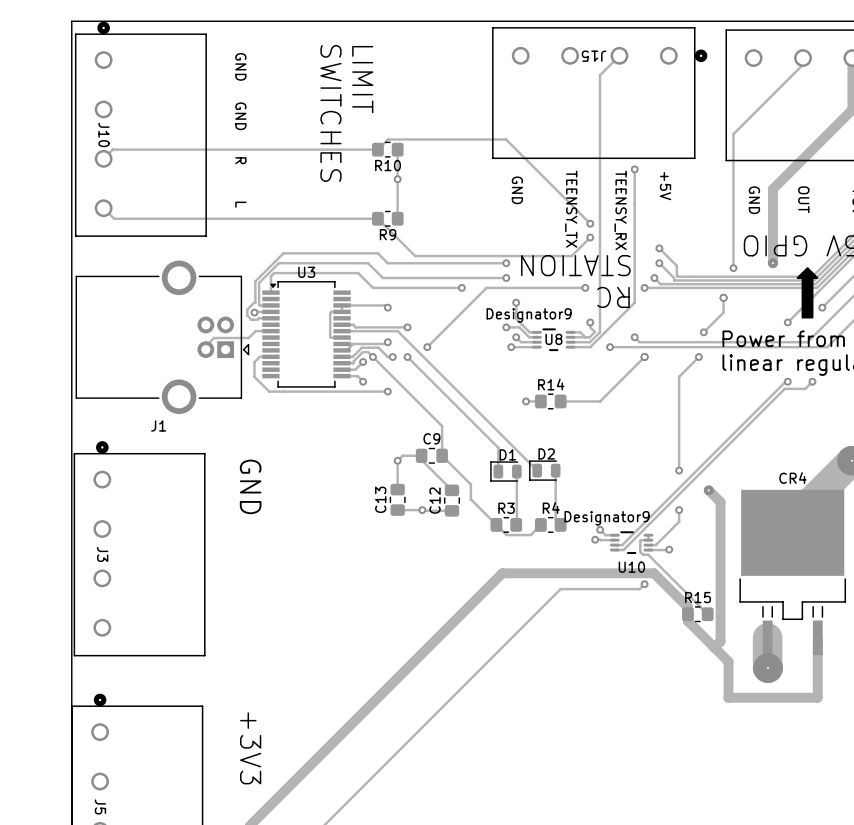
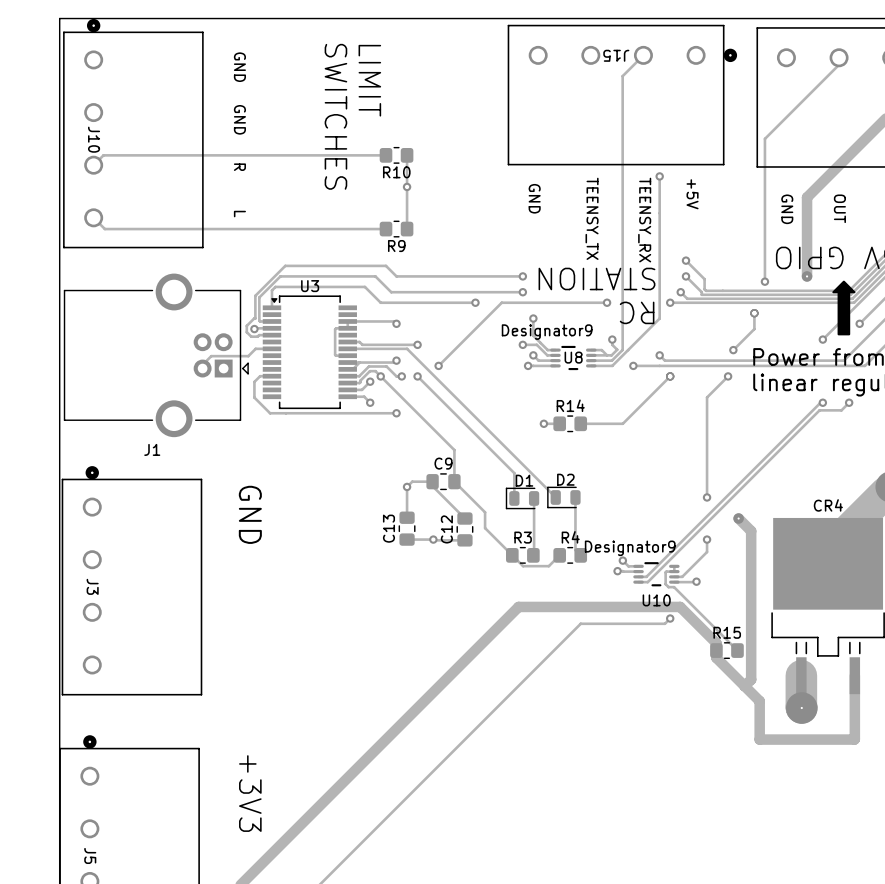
track: (377, 149) (388, 139) (506, 139) (590, 223) -> none
track: (377, 218) (415, 256) (571, 256) (590, 237) -> none
via: (590, 223) -> none
via: (590, 237) -> none

